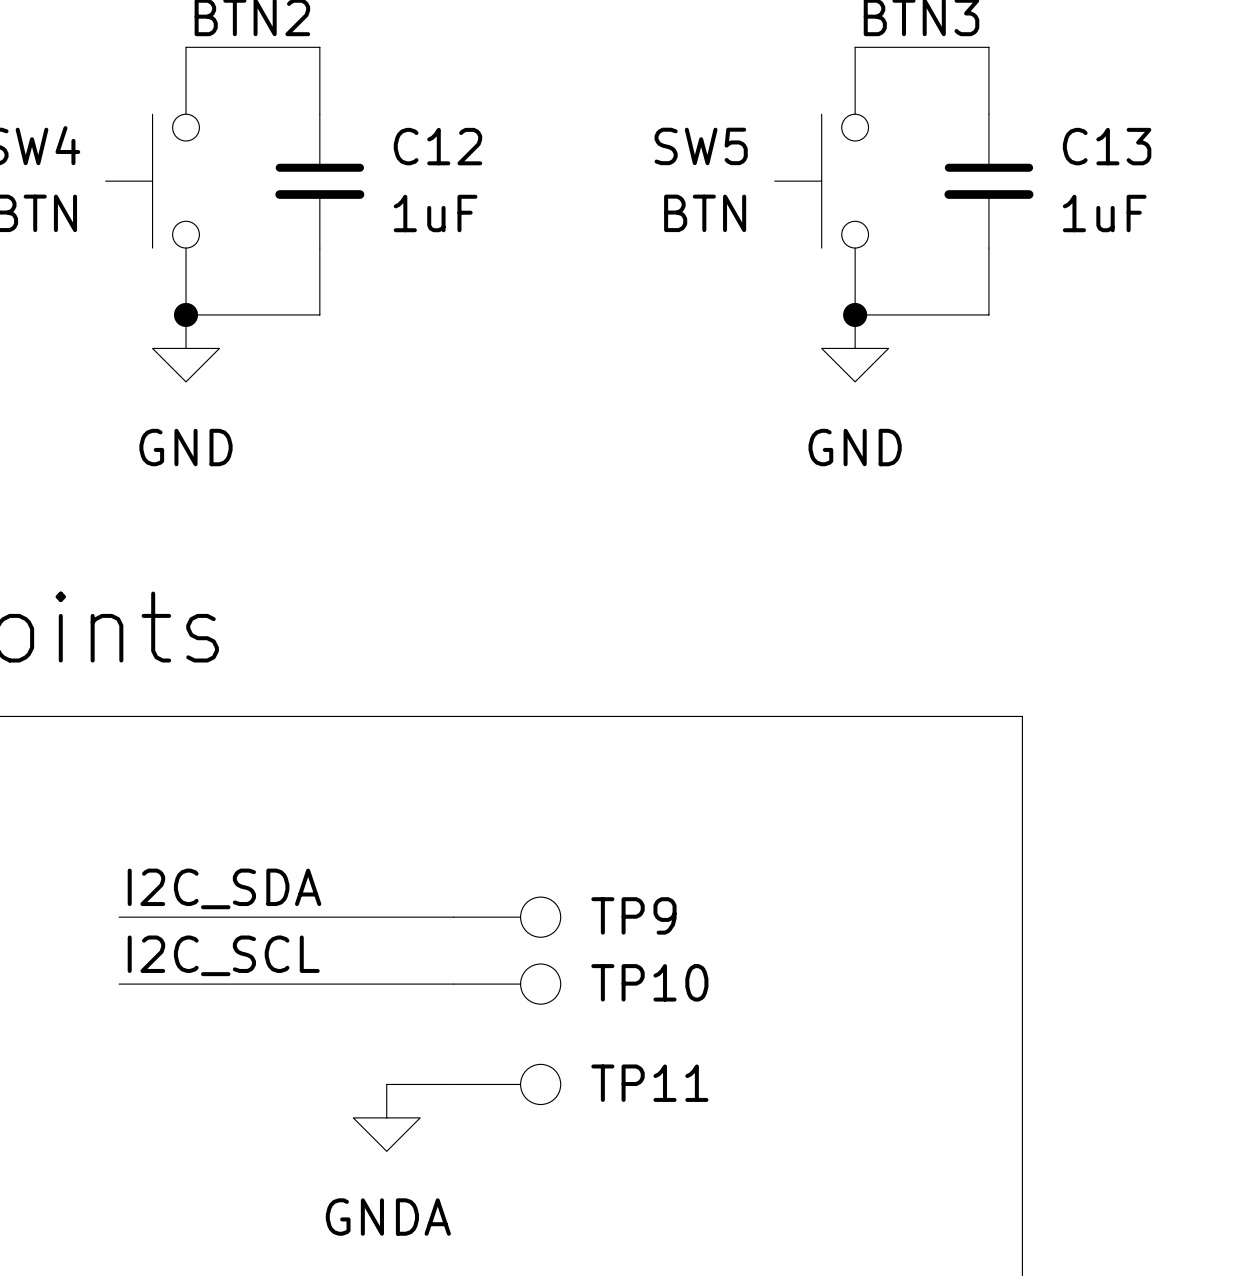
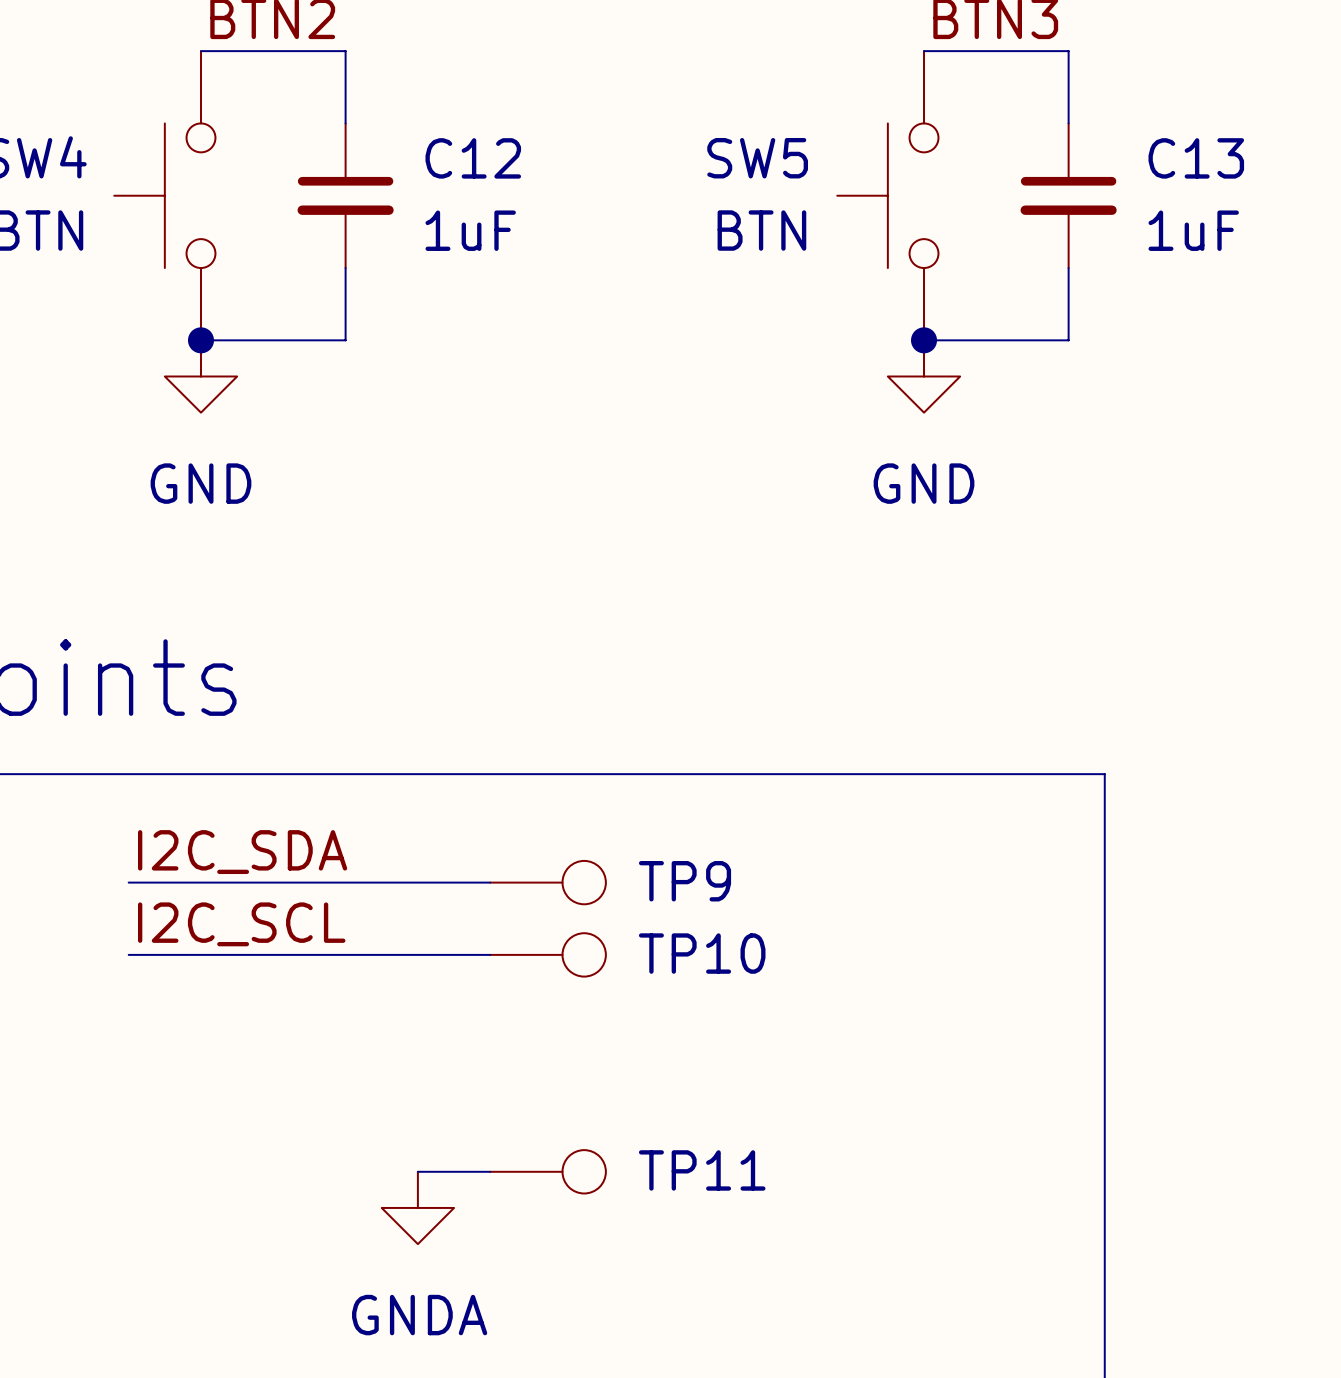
label position: I2C_SDA (224, 888) -> I2C_SDA (242, 852)
wire: (119, 917) (453, 917) -> (128, 882) (490, 882)
TP9 position: (507, 917) -> (548, 882)
label position: I2C_SCL (223, 955) -> I2C_SCL (241, 924)
wire: (119, 984) (453, 984) -> (128, 954) (490, 954)
TP10 position: (507, 984) -> (548, 954)

